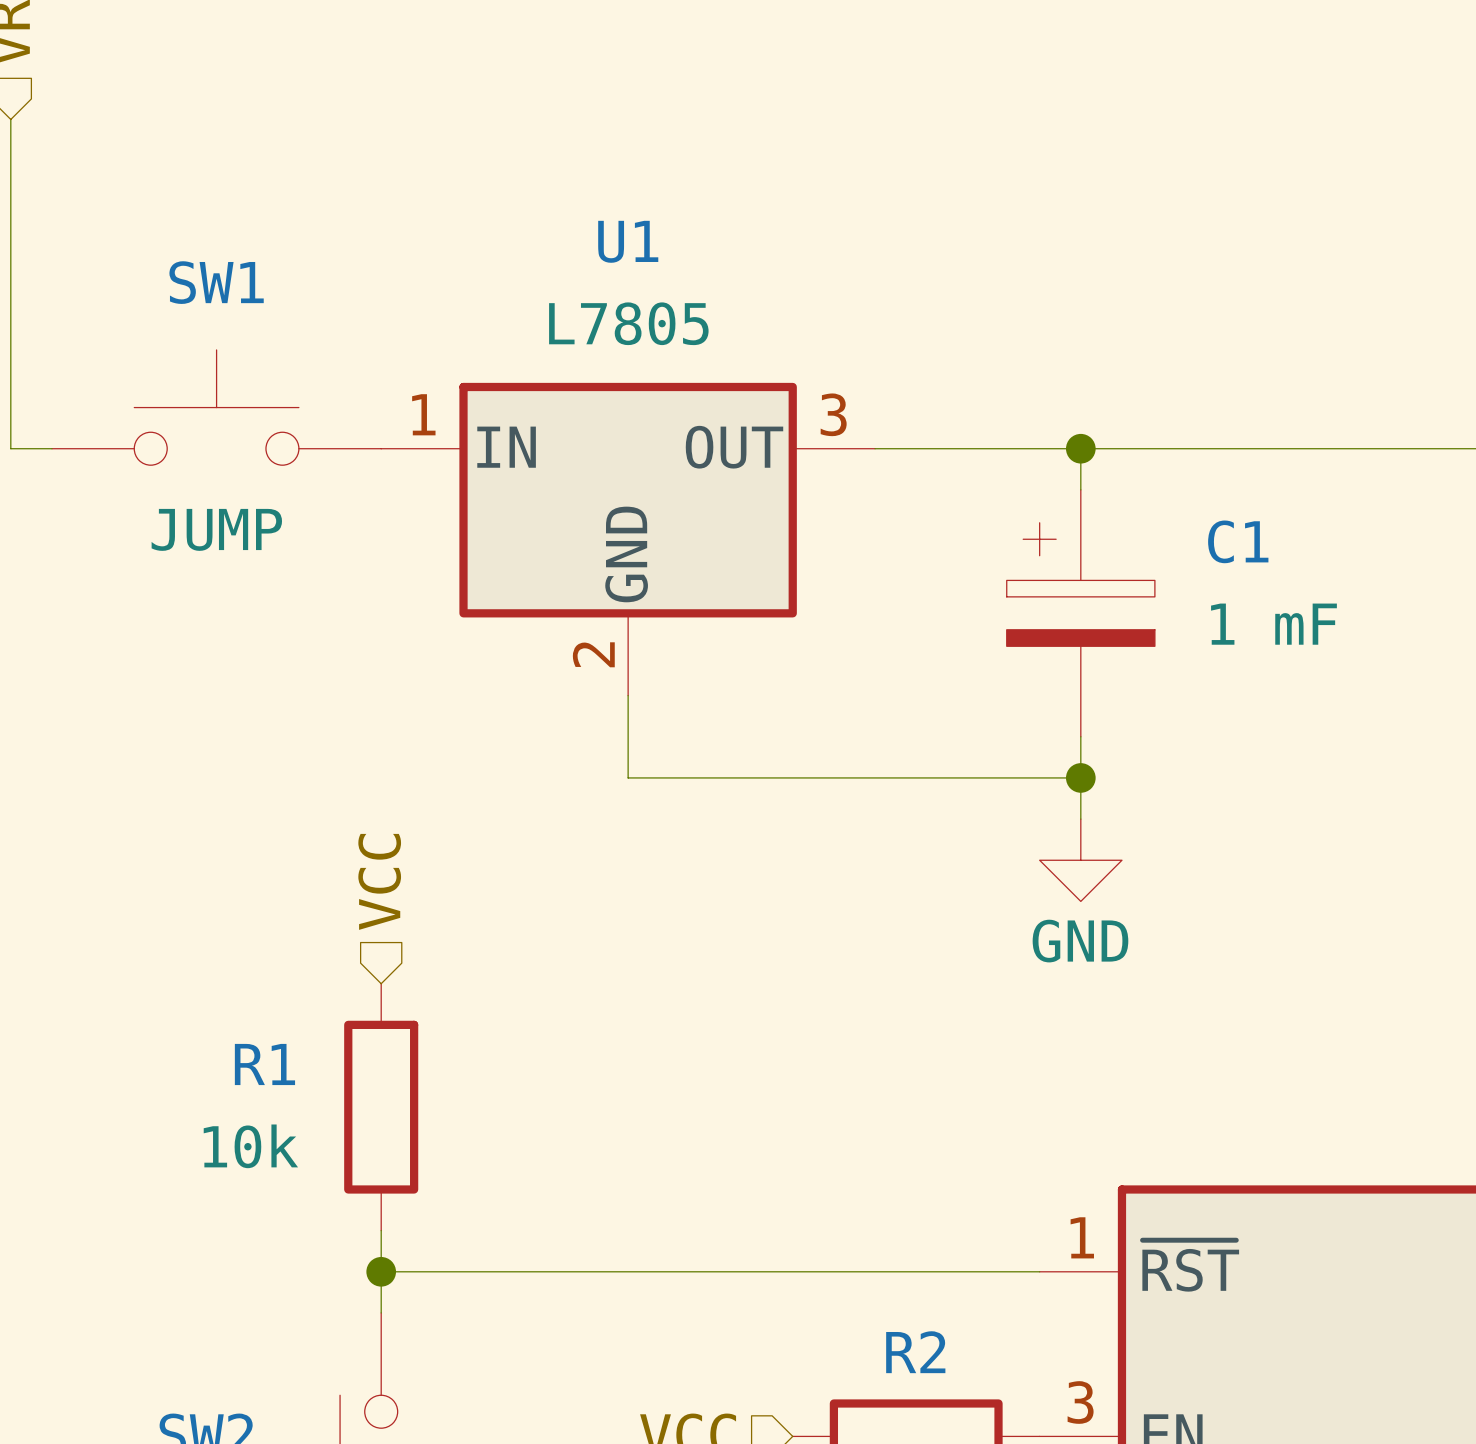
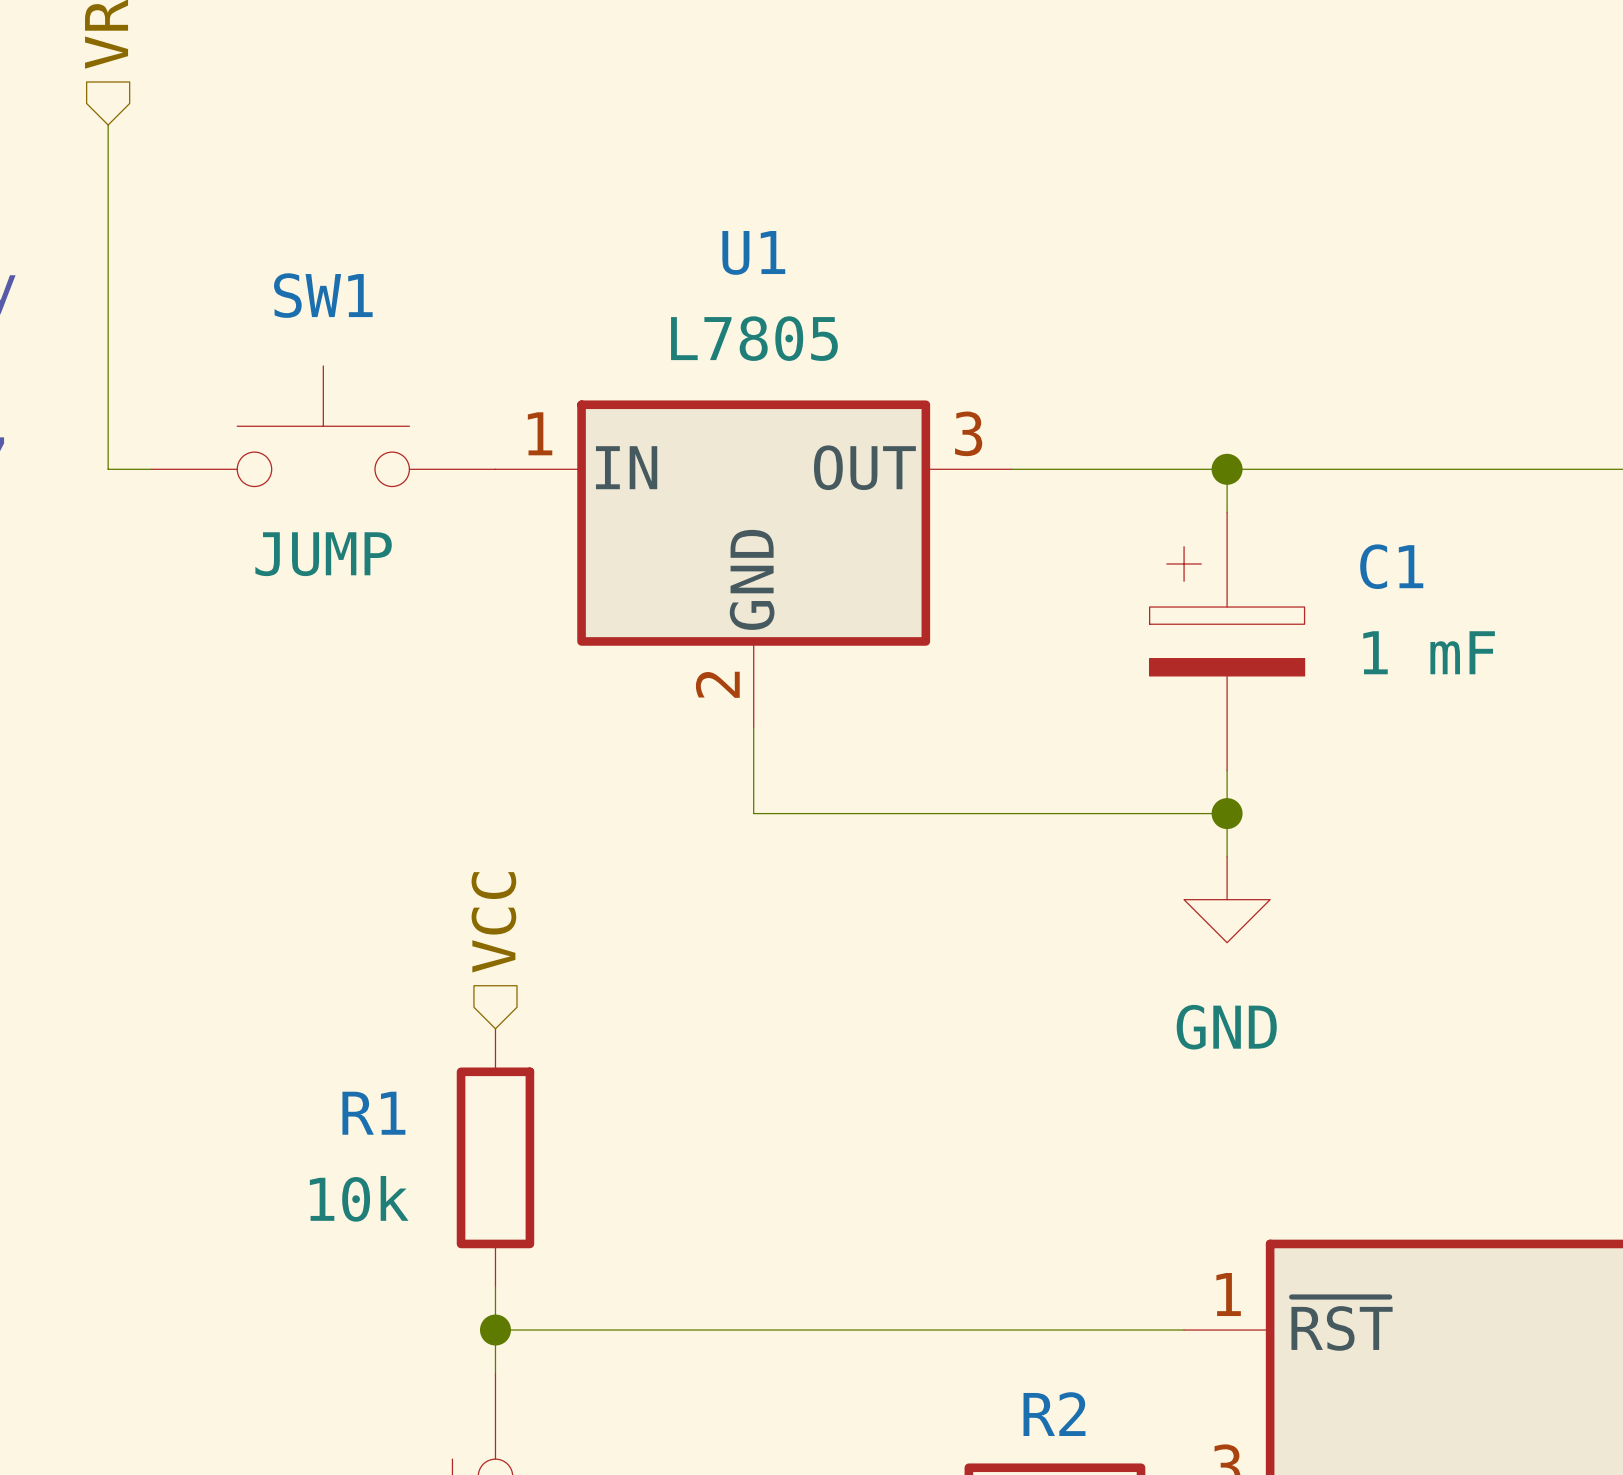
power symbol text position: GND (1080, 941) -> GND (1226, 1027)

